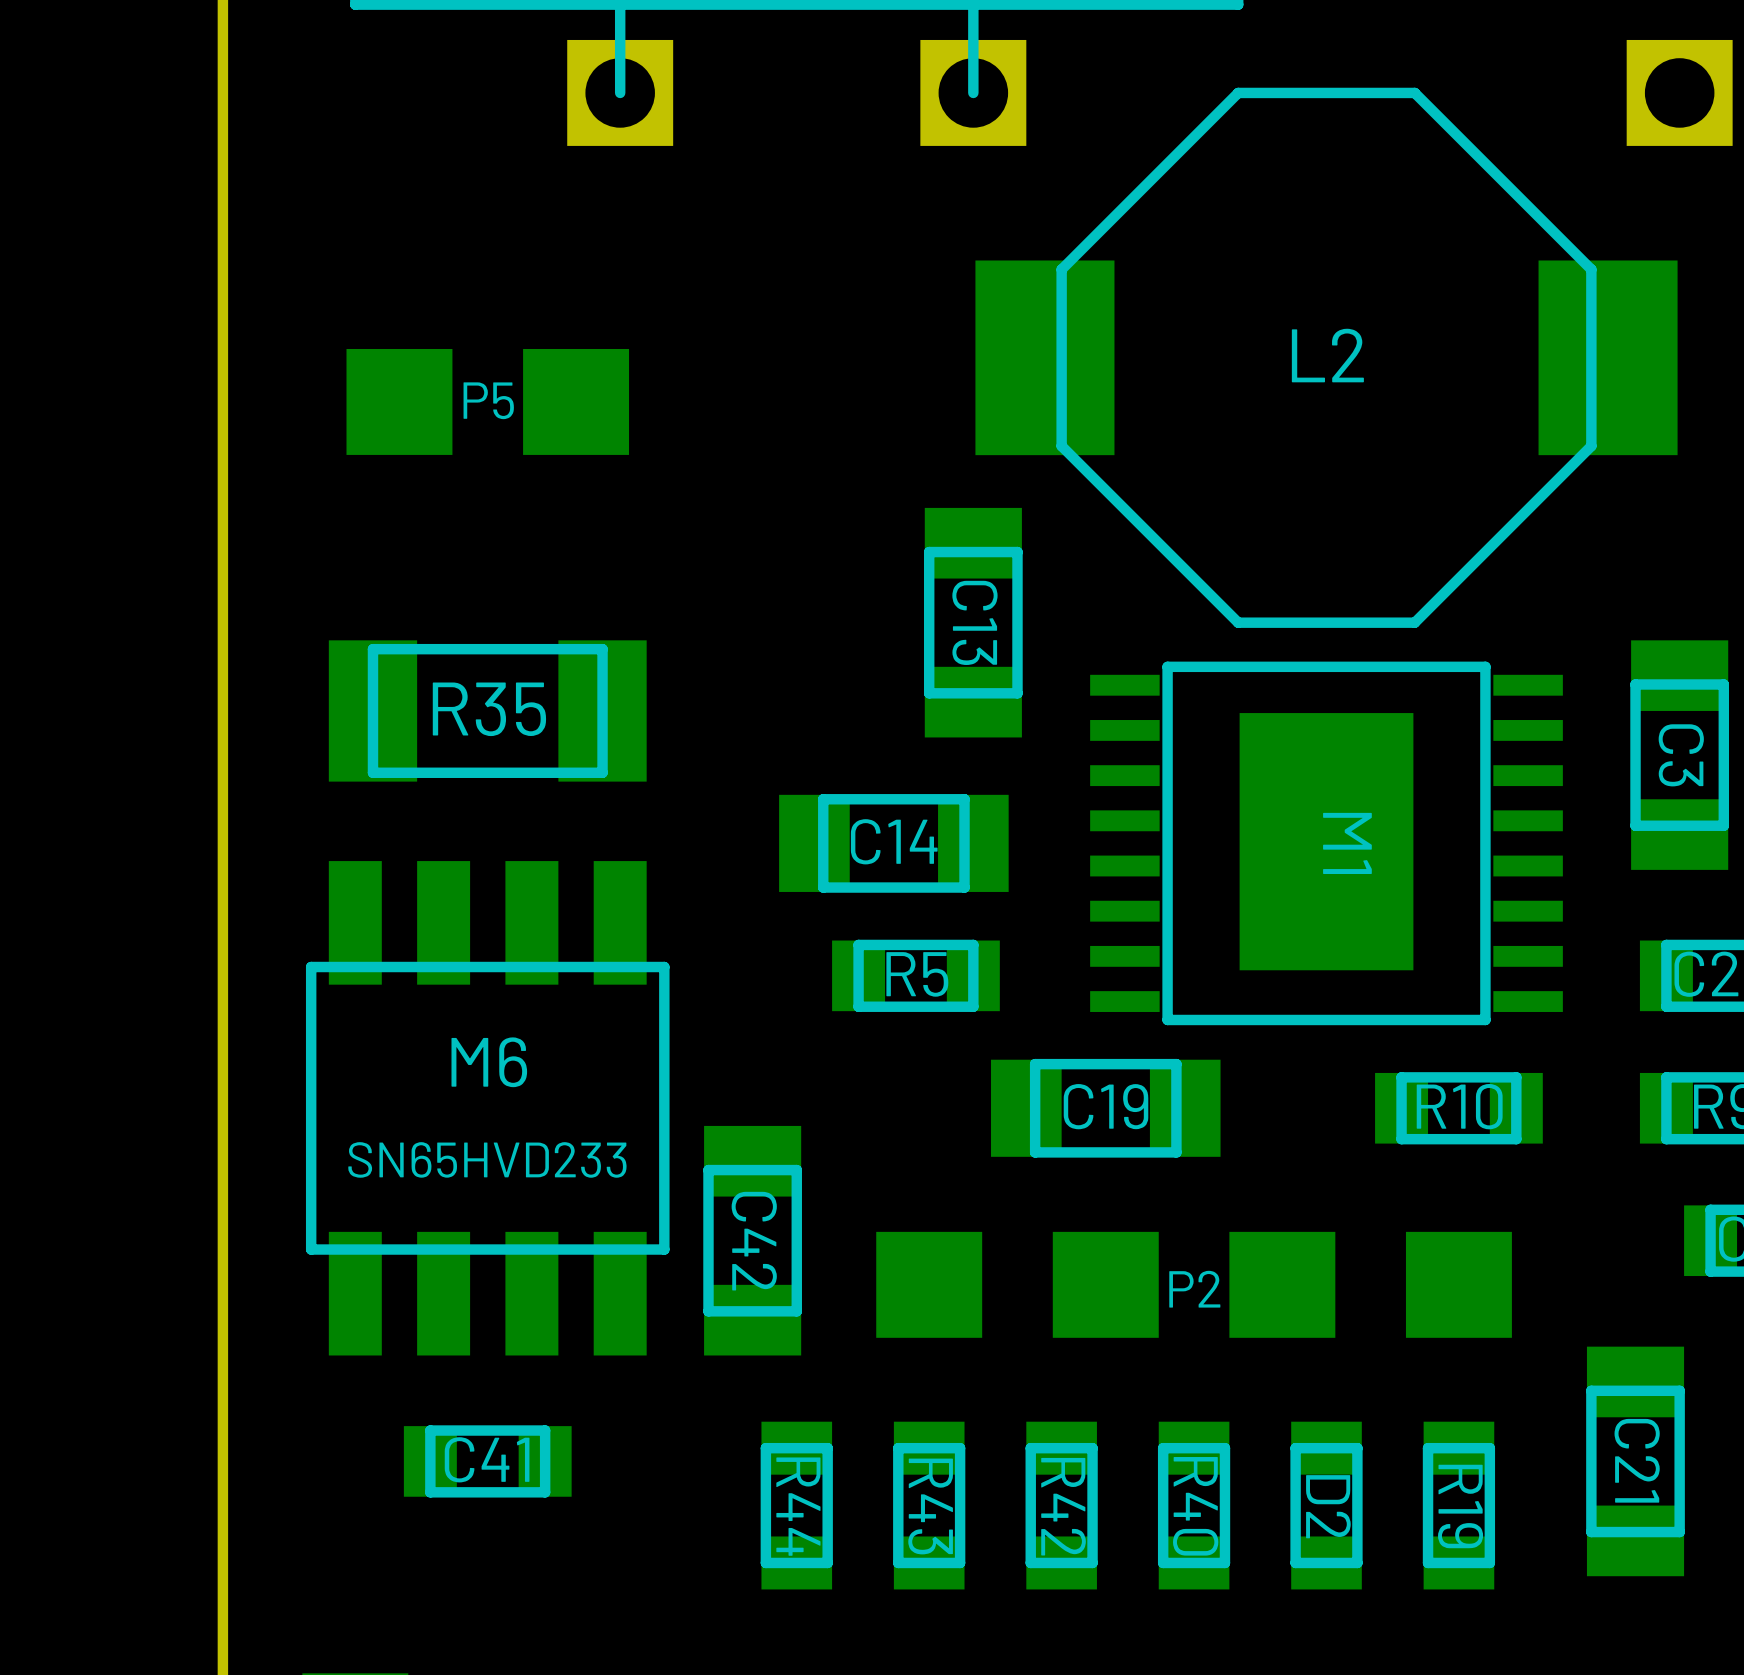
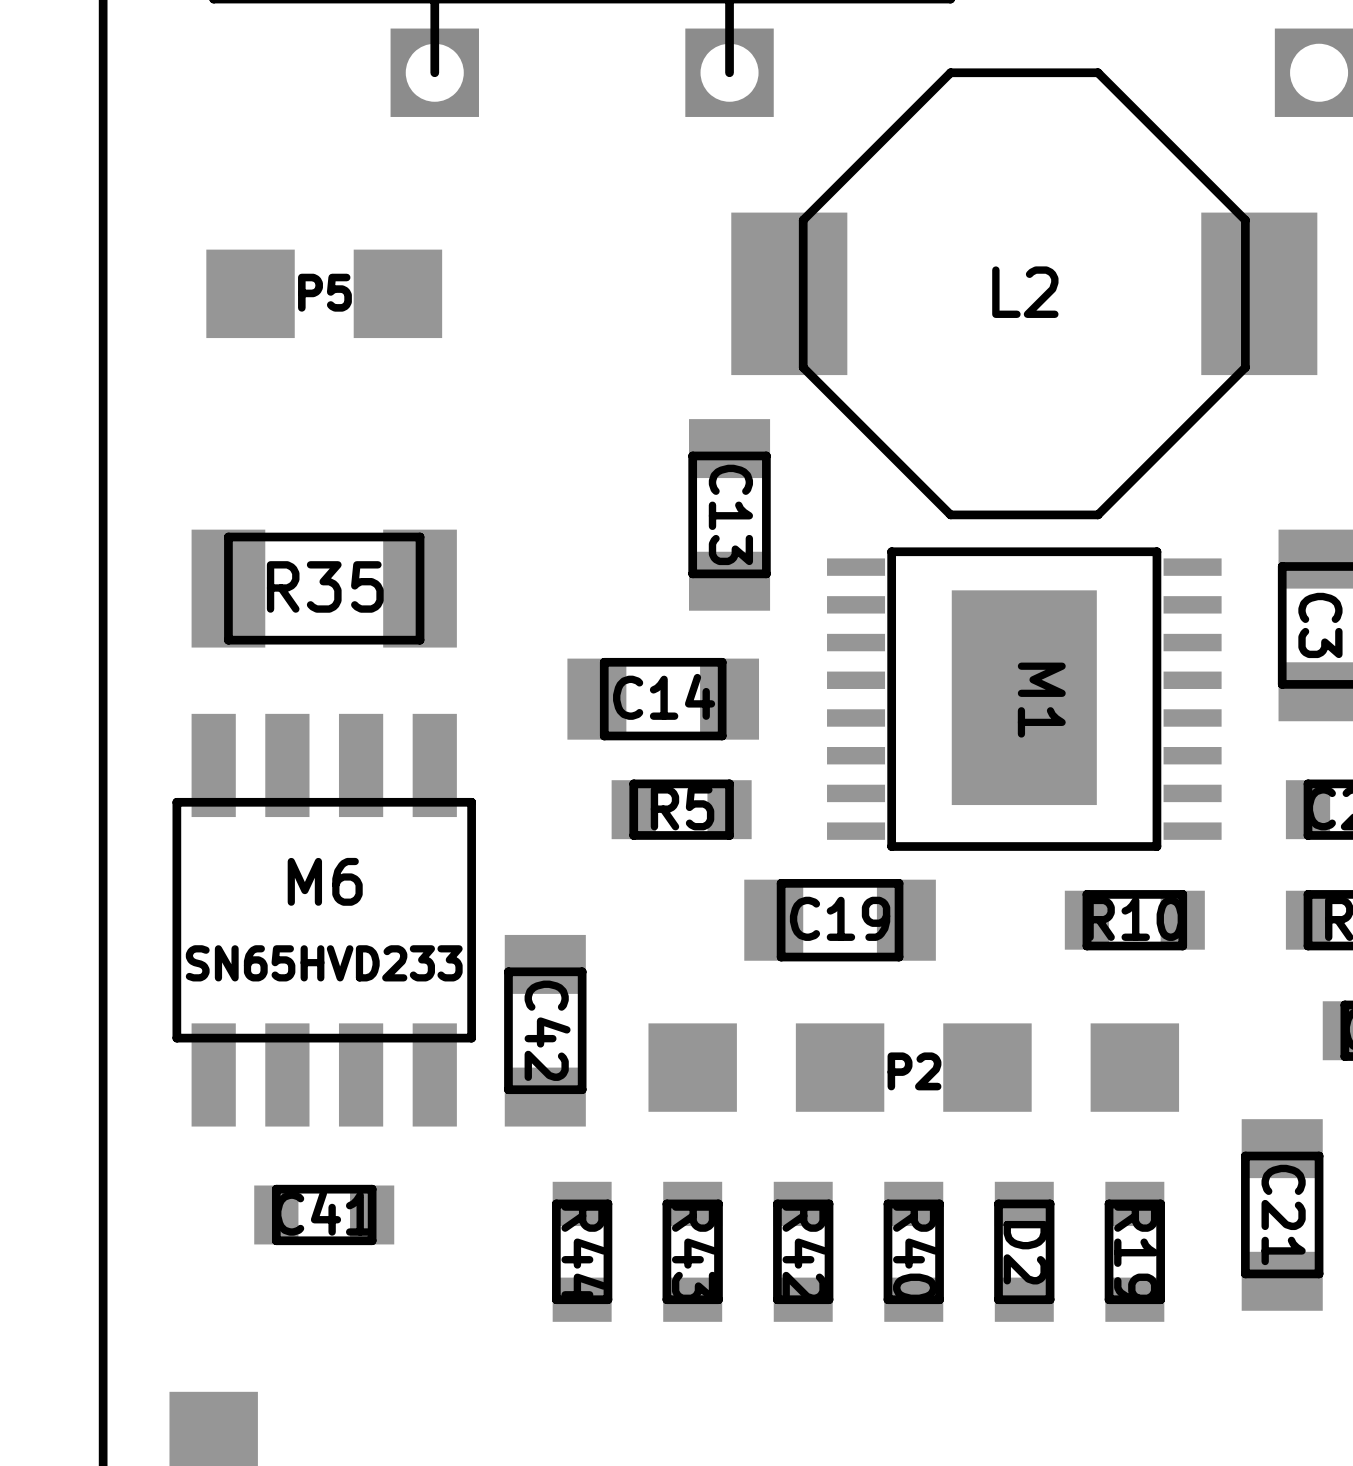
P5 position: (487, 401) -> (324, 293)

